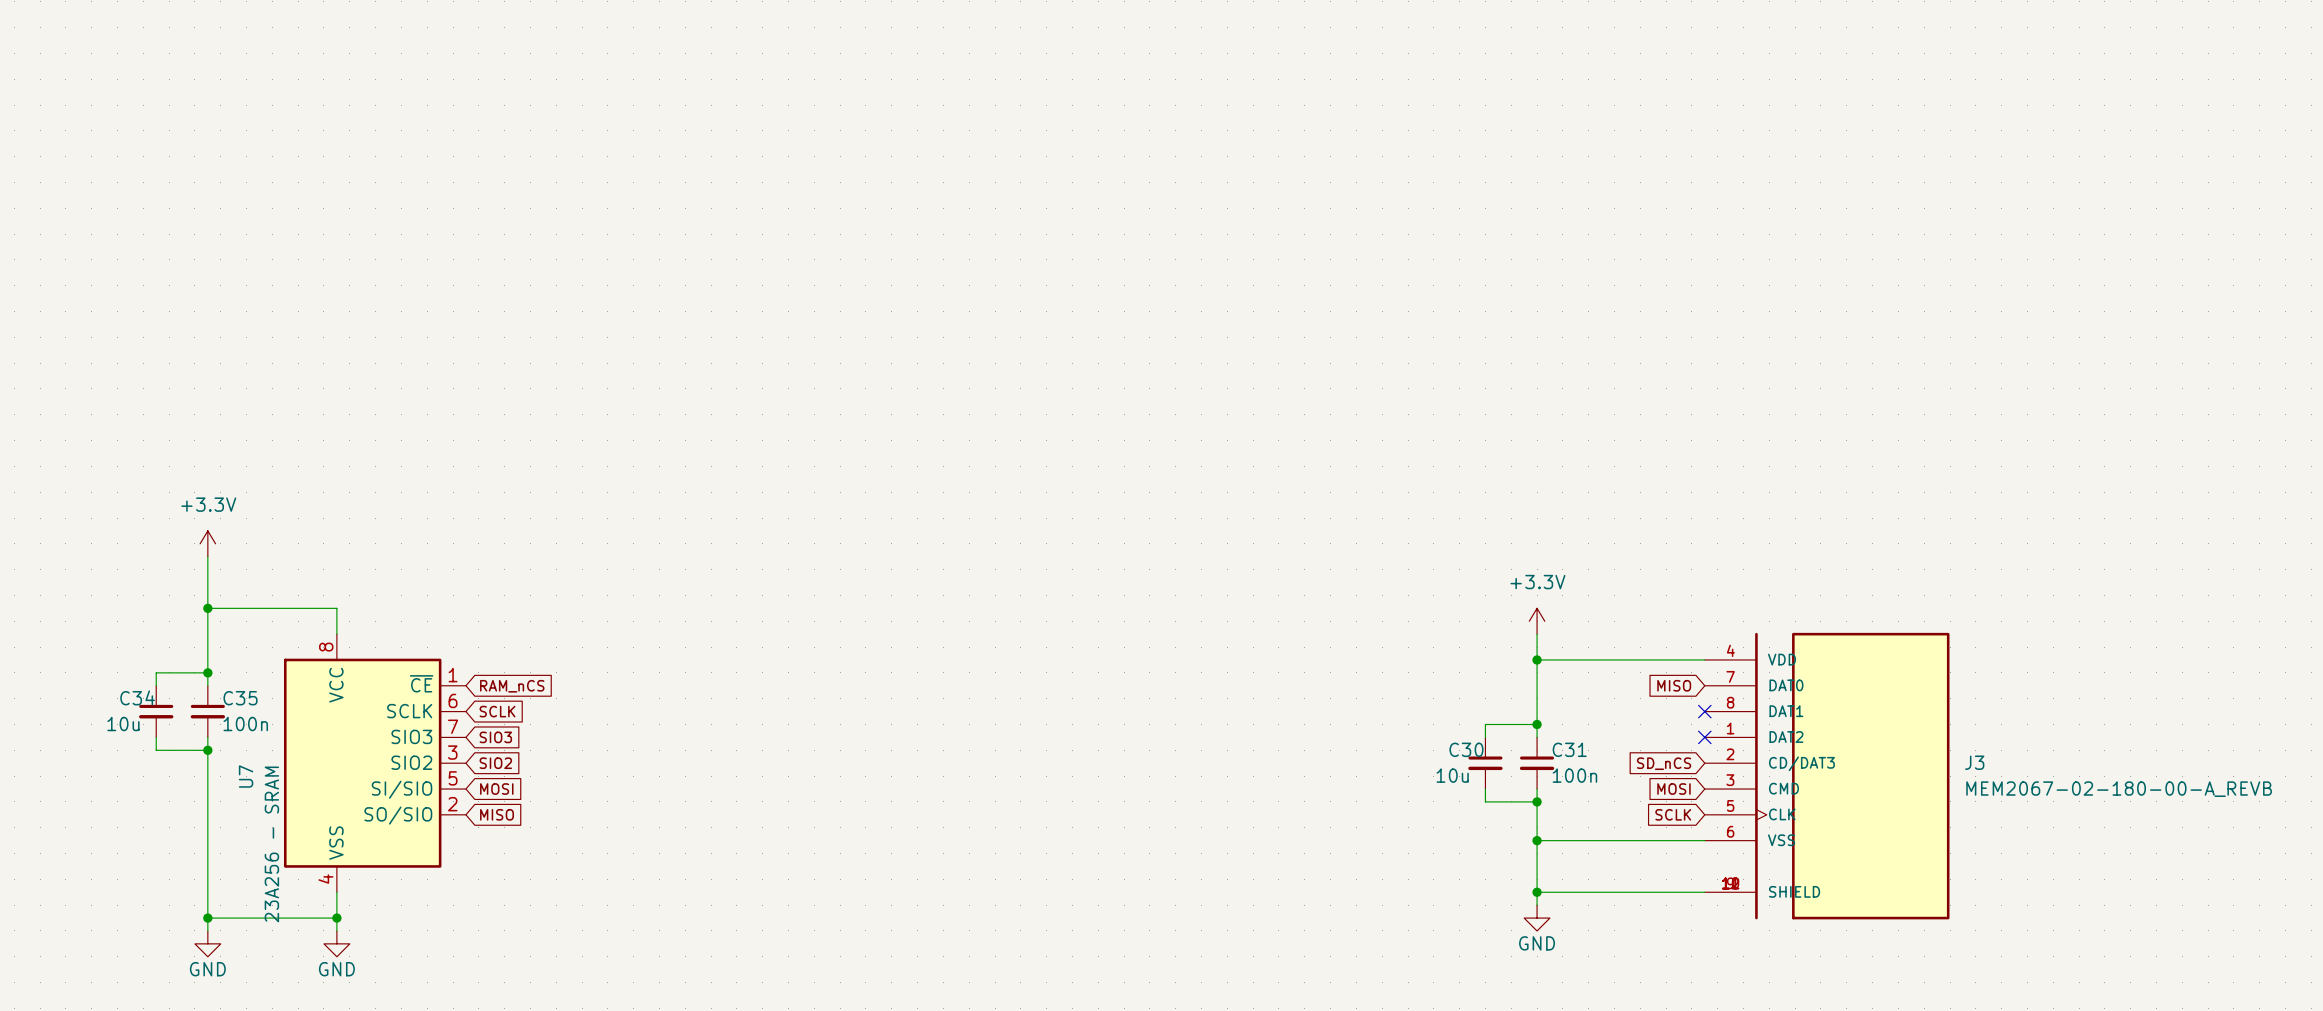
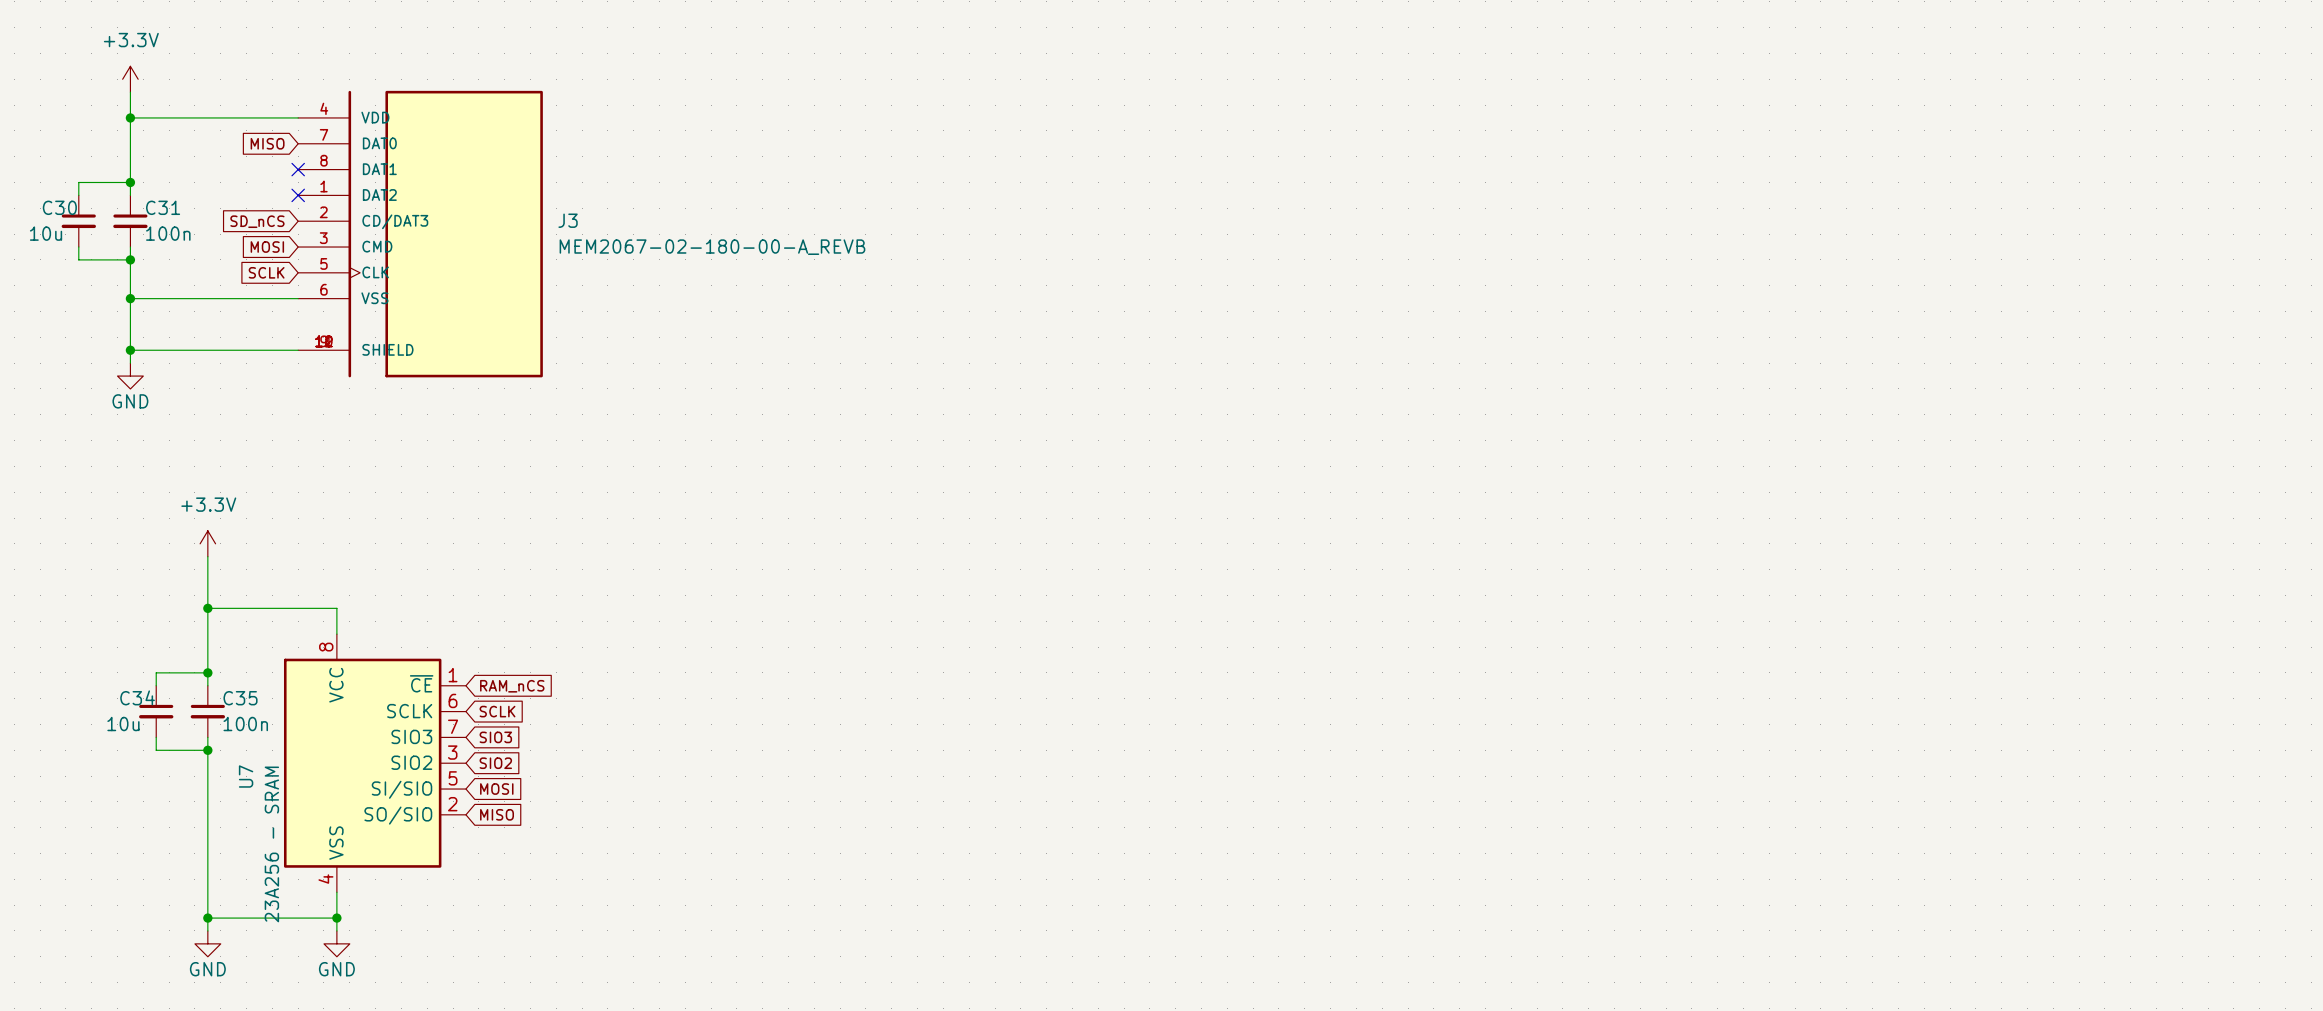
power symbol: none -> +3.3V (130, 79)
wire: none -> (130, 92) (130, 195)
wire: none -> (130, 117) (298, 117)
junction: none -> (130, 117)
global label: none -> MISO (267, 143)
no-connect mark: none -> (298, 169)
wire: none -> (130, 182) (78, 182) (78, 195)
junction: none -> (130, 182)
no-connect mark: none -> (298, 195)
global label: none -> SD_nCS (257, 221)
wire: none -> (78, 247) (78, 259) (130, 259)
wire: none -> (130, 247) (130, 363)
global label: none -> MOSI (267, 247)
junction: none -> (130, 259)
global label: none -> SCLK (266, 272)
wire: none -> (130, 298) (298, 298)
junction: none -> (130, 298)
wire: none -> (130, 350) (298, 350)
junction: none -> (130, 350)
power symbol: none -> GND (130, 376)
power symbol: +3.3V (1537, 621) -> none
wire: (1537, 634) (1537, 737) -> none
wire: (1537, 659) (1704, 659) -> none
junction: (1537, 659) -> none
global label: MISO (1674, 685) -> none
no-connect mark: (1704, 711) -> none
wire: (1537, 724) (1485, 724) (1485, 737) -> none
junction: (1537, 724) -> none
no-connect mark: (1704, 737) -> none
C30 position: (1485, 763) -> (78, 221)
C31 position: (1537, 763) -> (130, 221)
global label: SD_nCS (1664, 763) -> none
J3 position: (1827, 776) -> (420, 234)
wire: (1485, 789) (1485, 801) (1537, 801) -> none
wire: (1537, 789) (1537, 905) -> none
global label: MOSI (1673, 789) -> none
junction: (1537, 801) -> none
global label: SCLK (1673, 814) -> none
wire: (1537, 840) (1704, 840) -> none
junction: (1537, 840) -> none
wire: (1537, 892) (1704, 892) -> none
junction: (1537, 892) -> none
power symbol: GND (1537, 918) -> none

